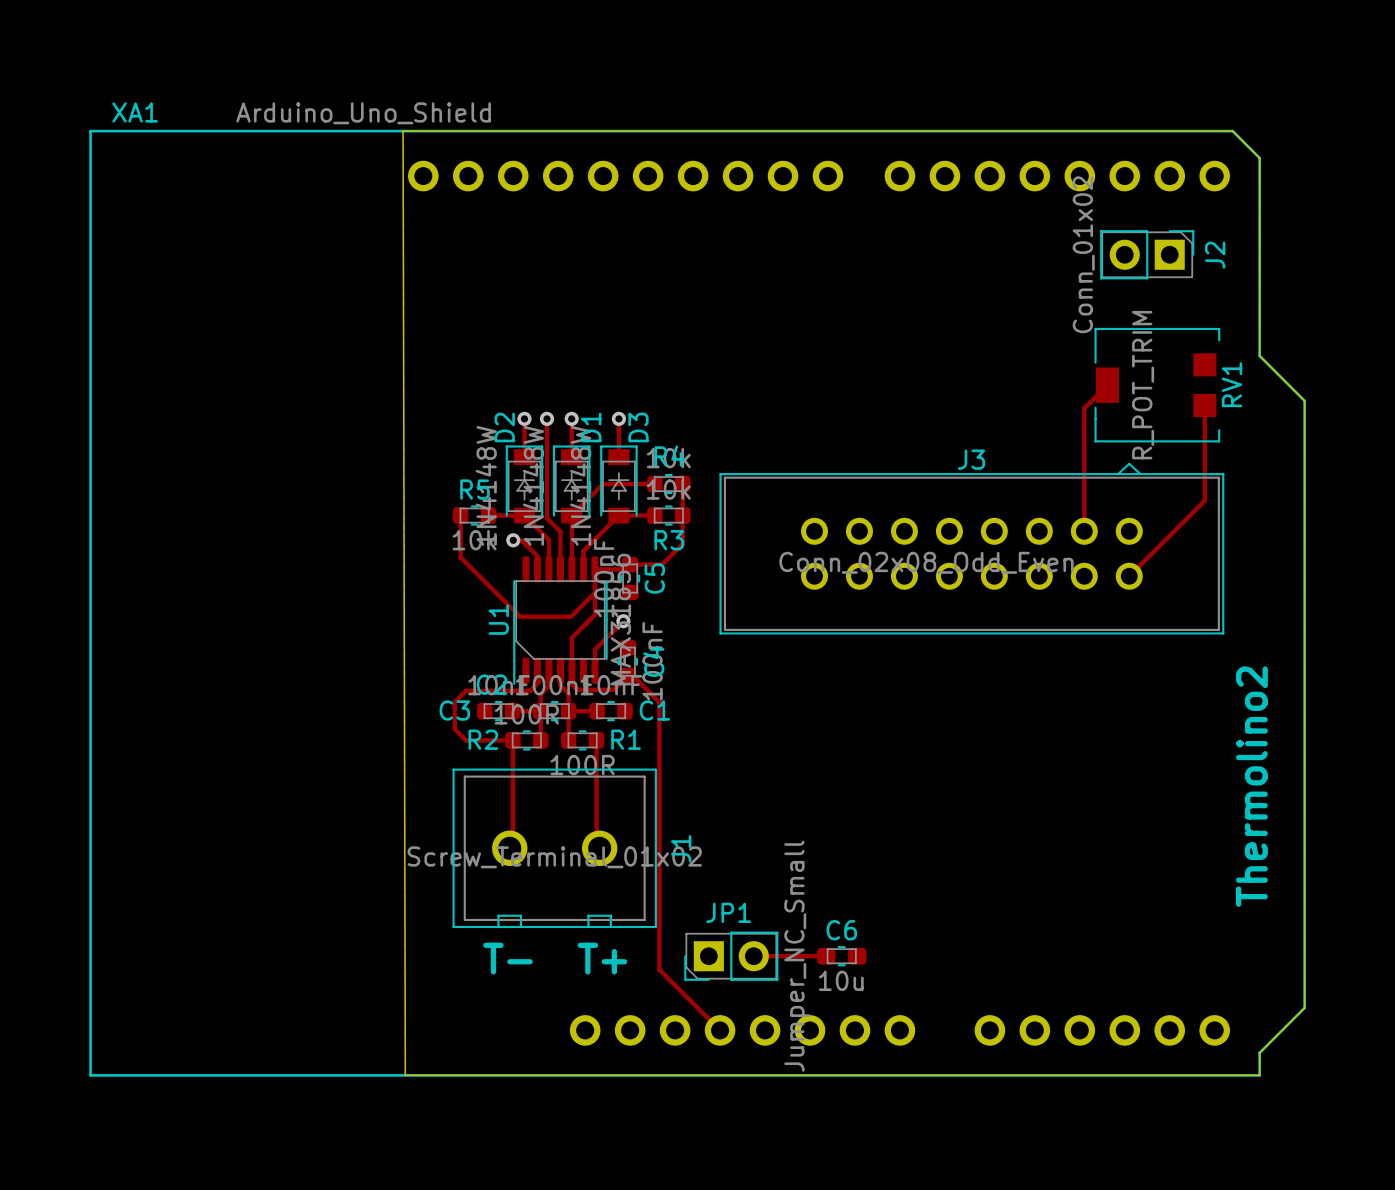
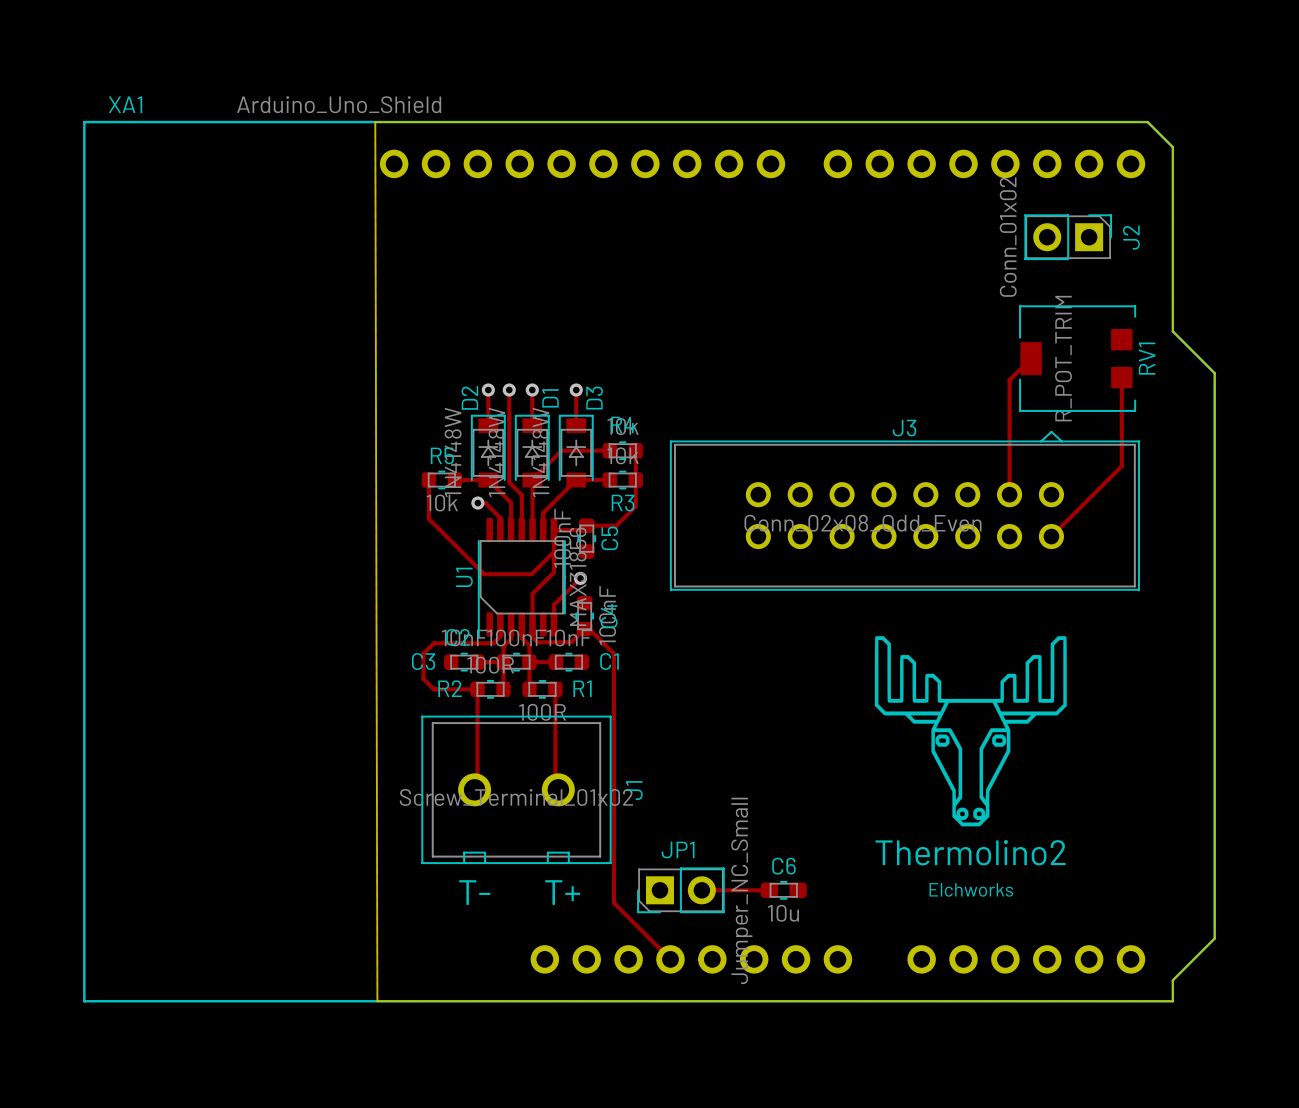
drawing: none -> [874, 636, 1067, 827]
text rotation: 0° (1251, 786) -> 90° clockwise (970, 852)
text: none -> Elchworks (971, 889)

